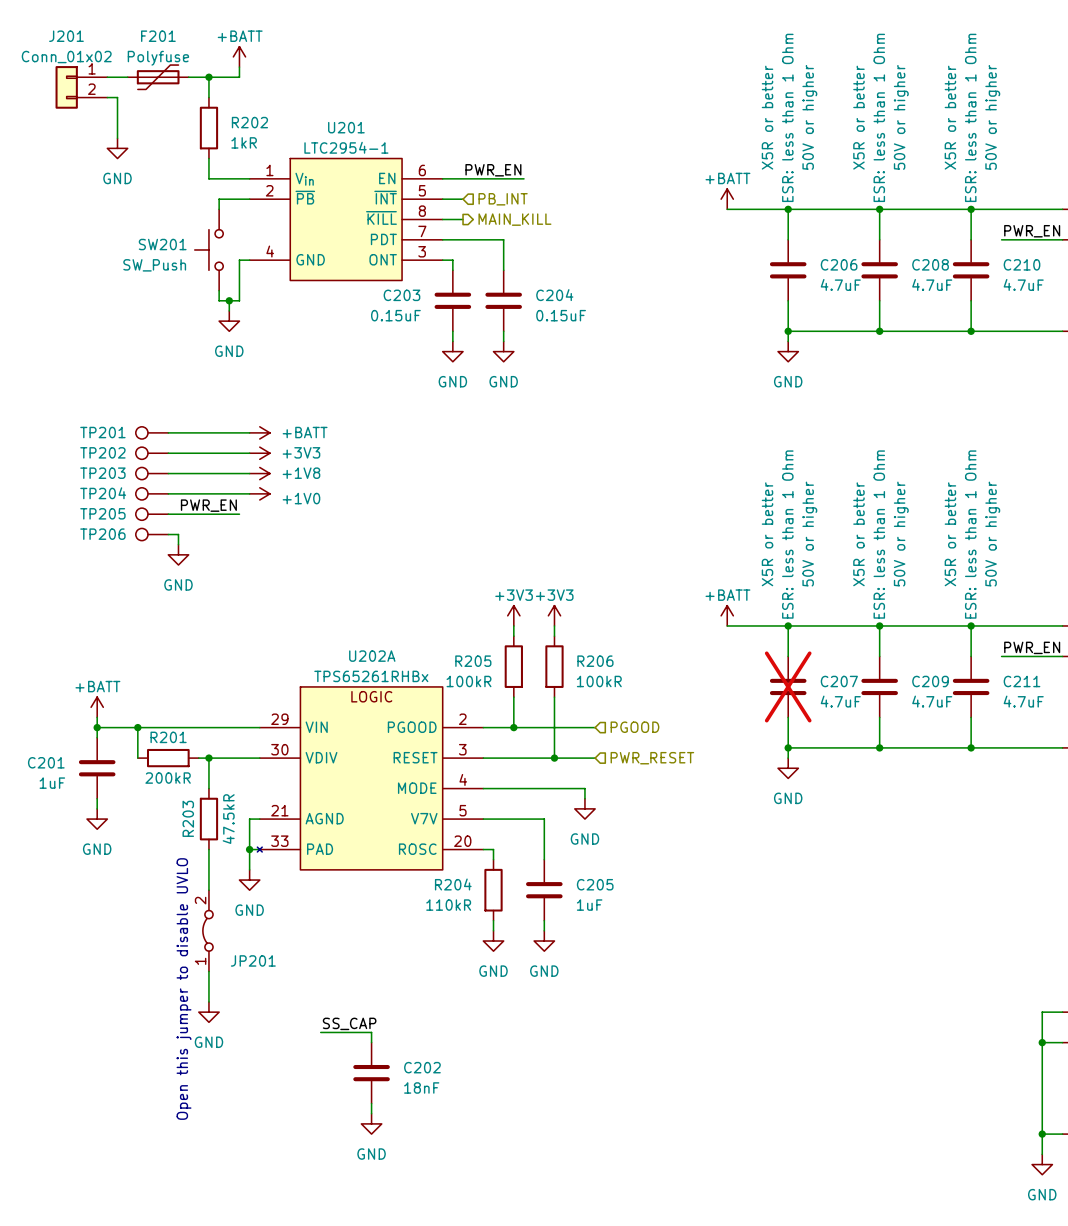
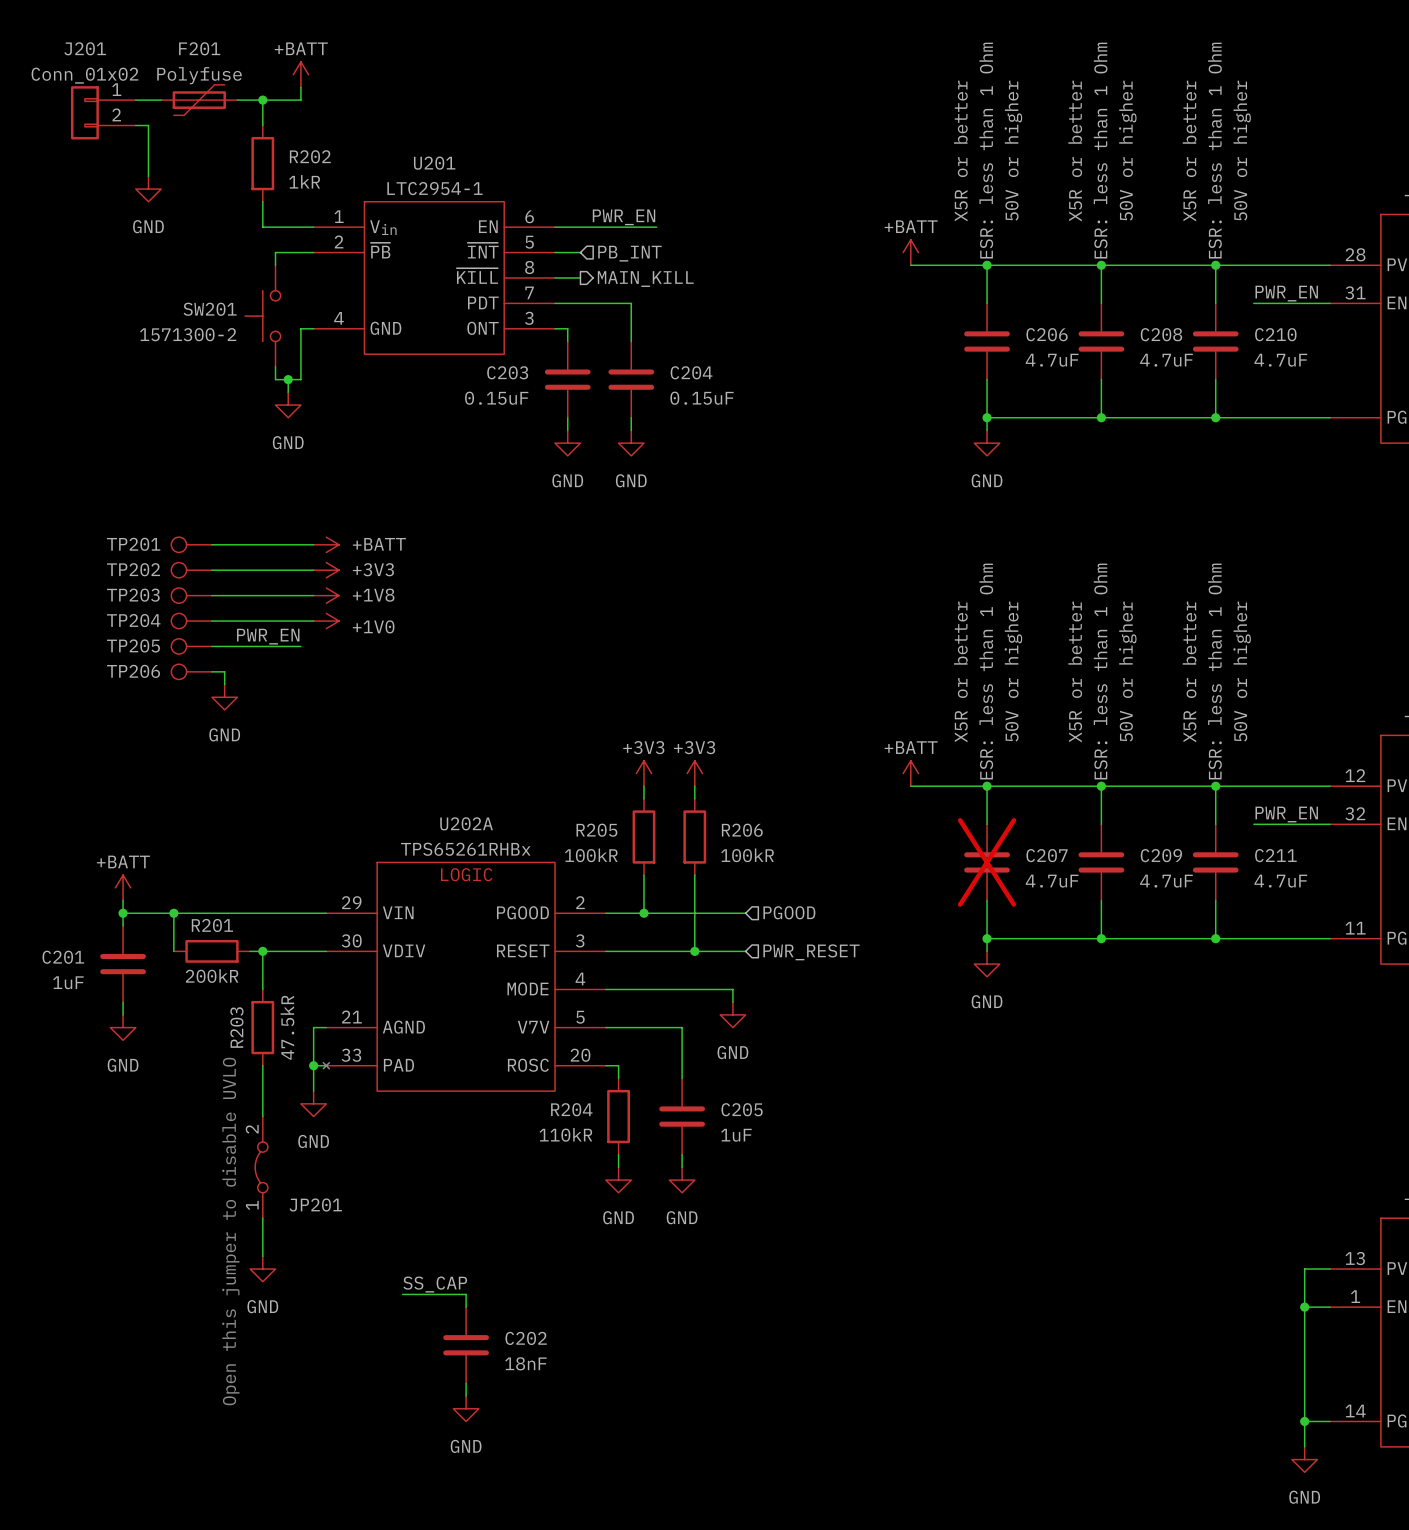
SW201 value: SW_Push (154, 265) -> 1571300-2 (188, 334)

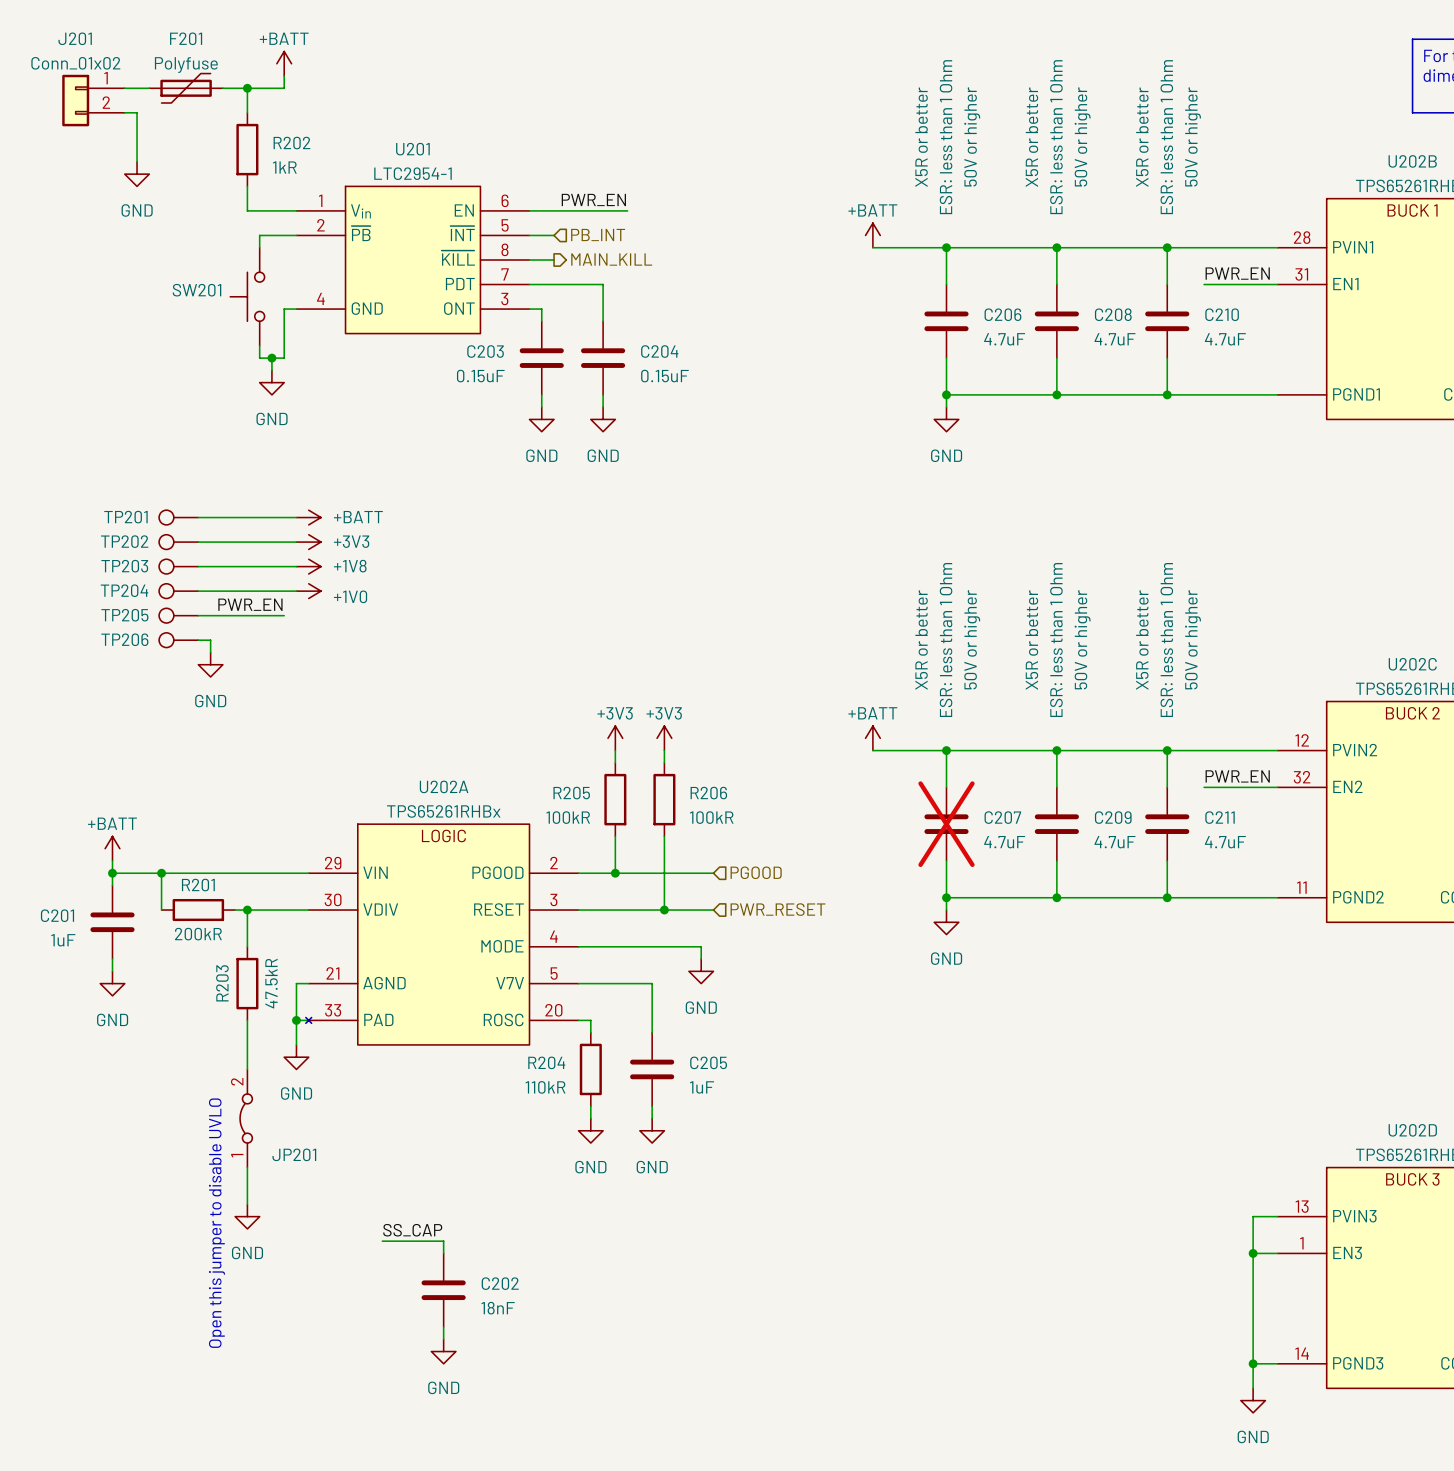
SW201 value: 1571300-2 (188, 334) -> none

